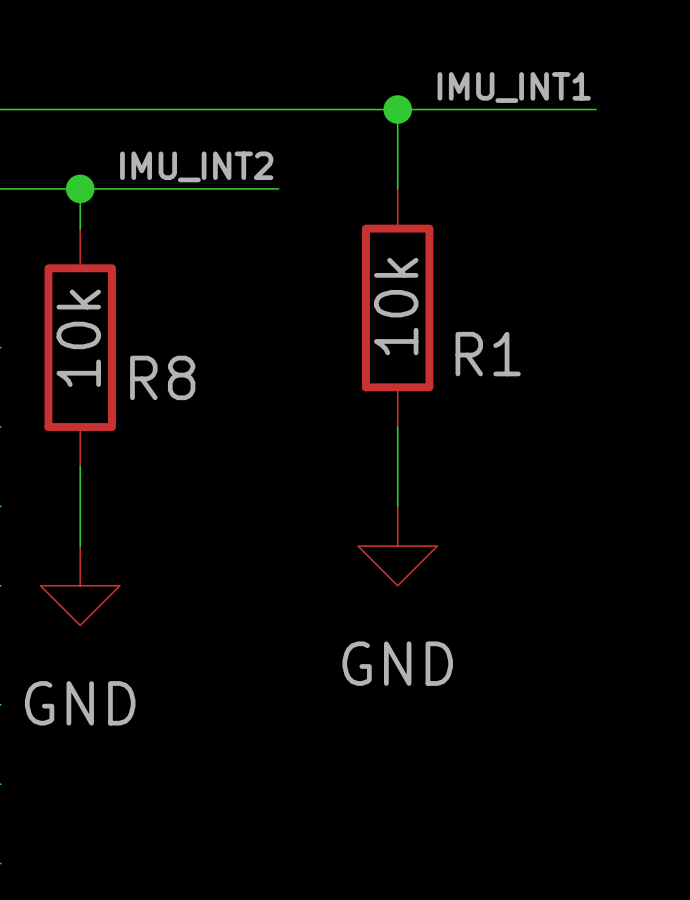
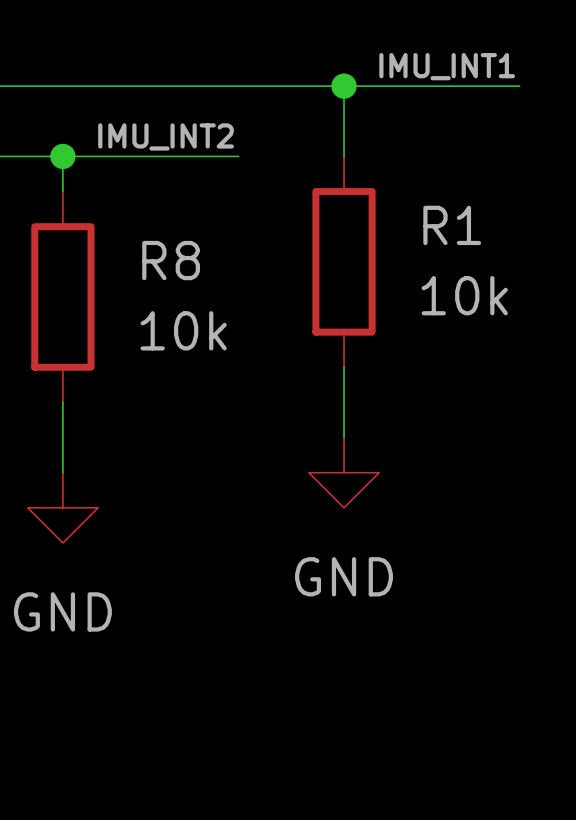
R1 value rotation: 0° (396, 306) -> 90° clockwise (464, 295)
R1 value position: 10k (396, 306) -> 10k (464, 295)
R8 value rotation: 0° (78, 338) -> 90° clockwise (183, 330)
R8 value position: 10k (78, 338) -> 10k (183, 330)
R1 name position: R1 (488, 354) -> R1 (452, 225)
R8 name position: R8 (162, 377) -> R8 (171, 260)

